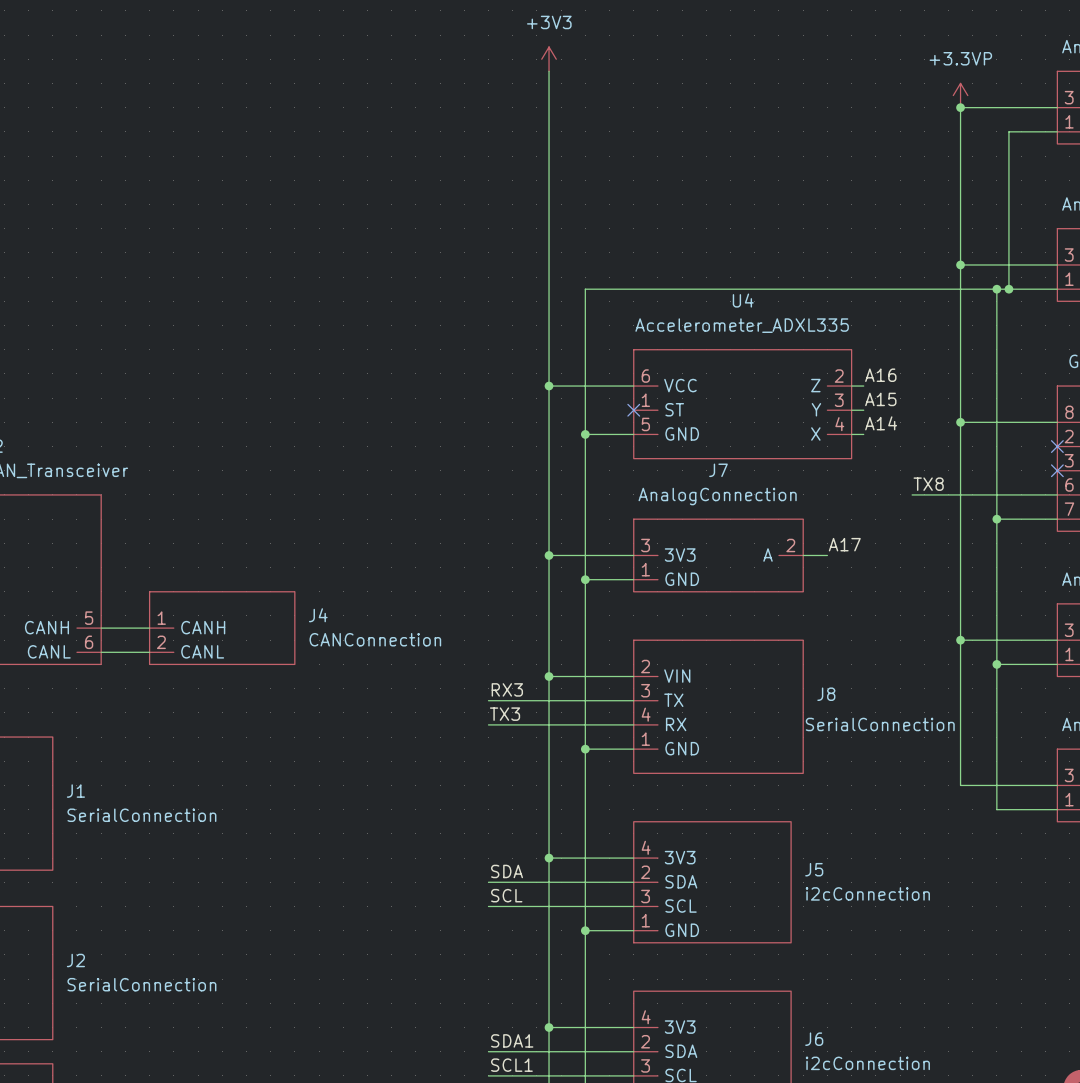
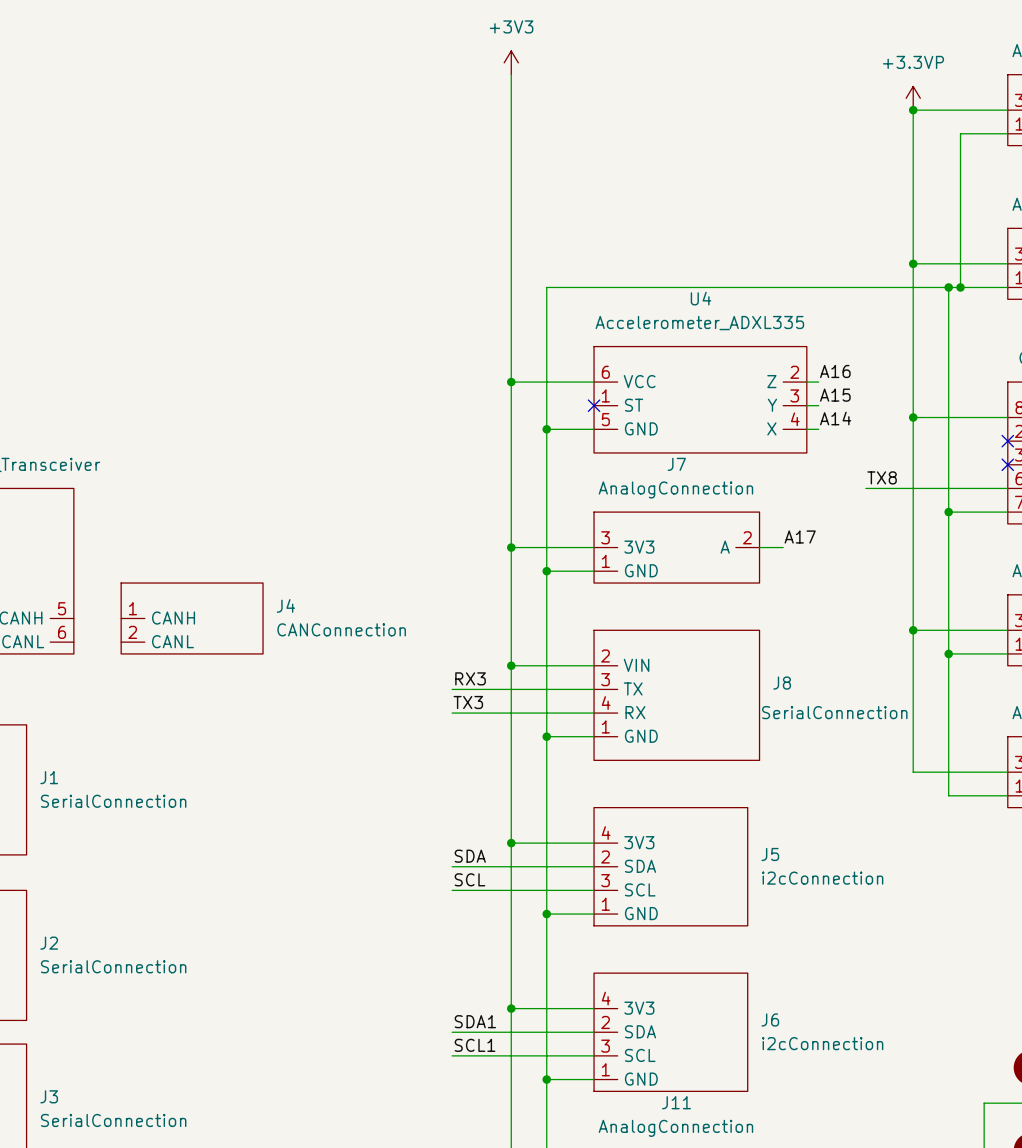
wire: (101, 628) (149, 628) -> none
wire: (101, 652) (149, 652) -> none

